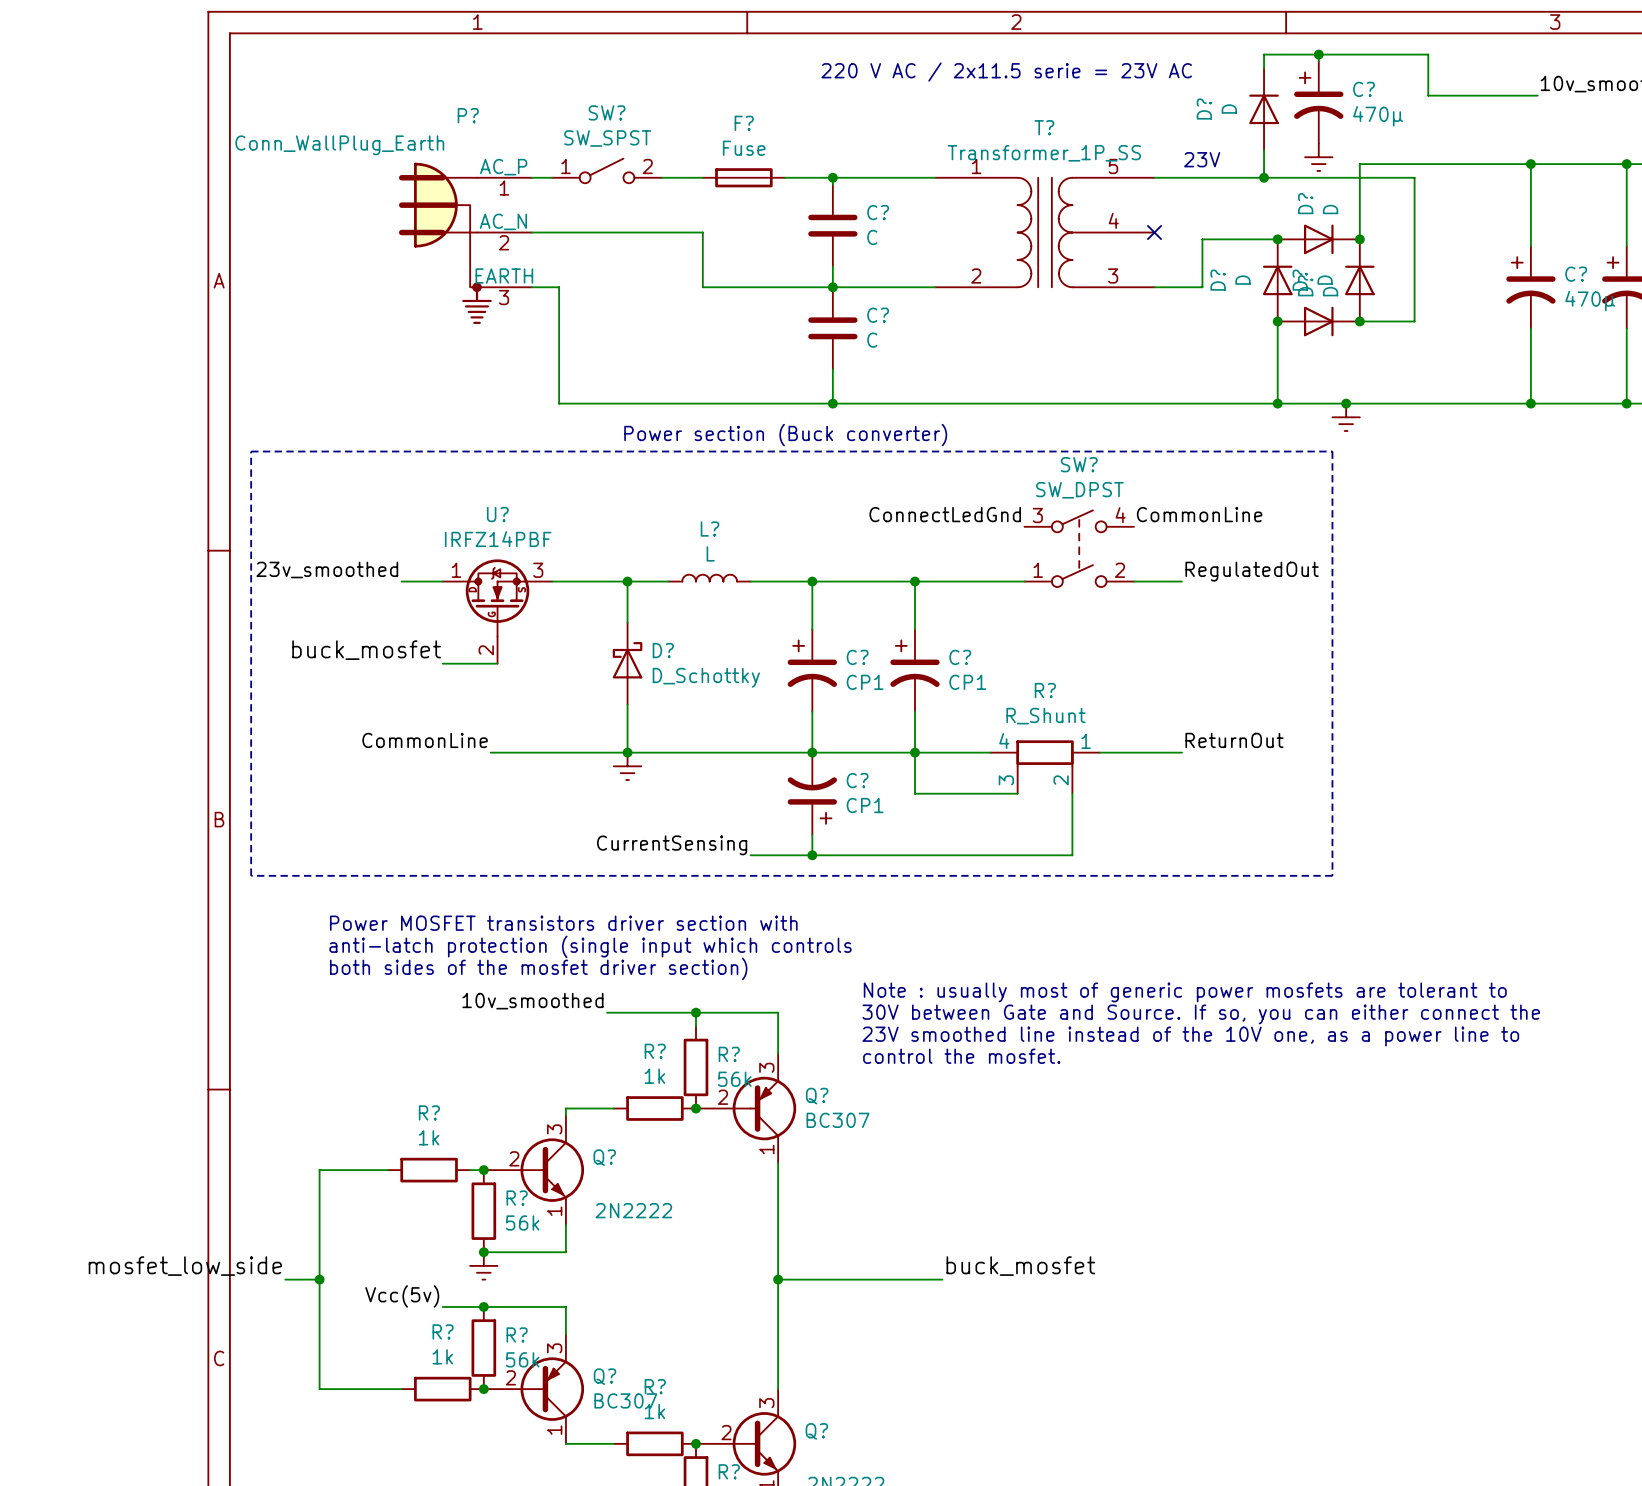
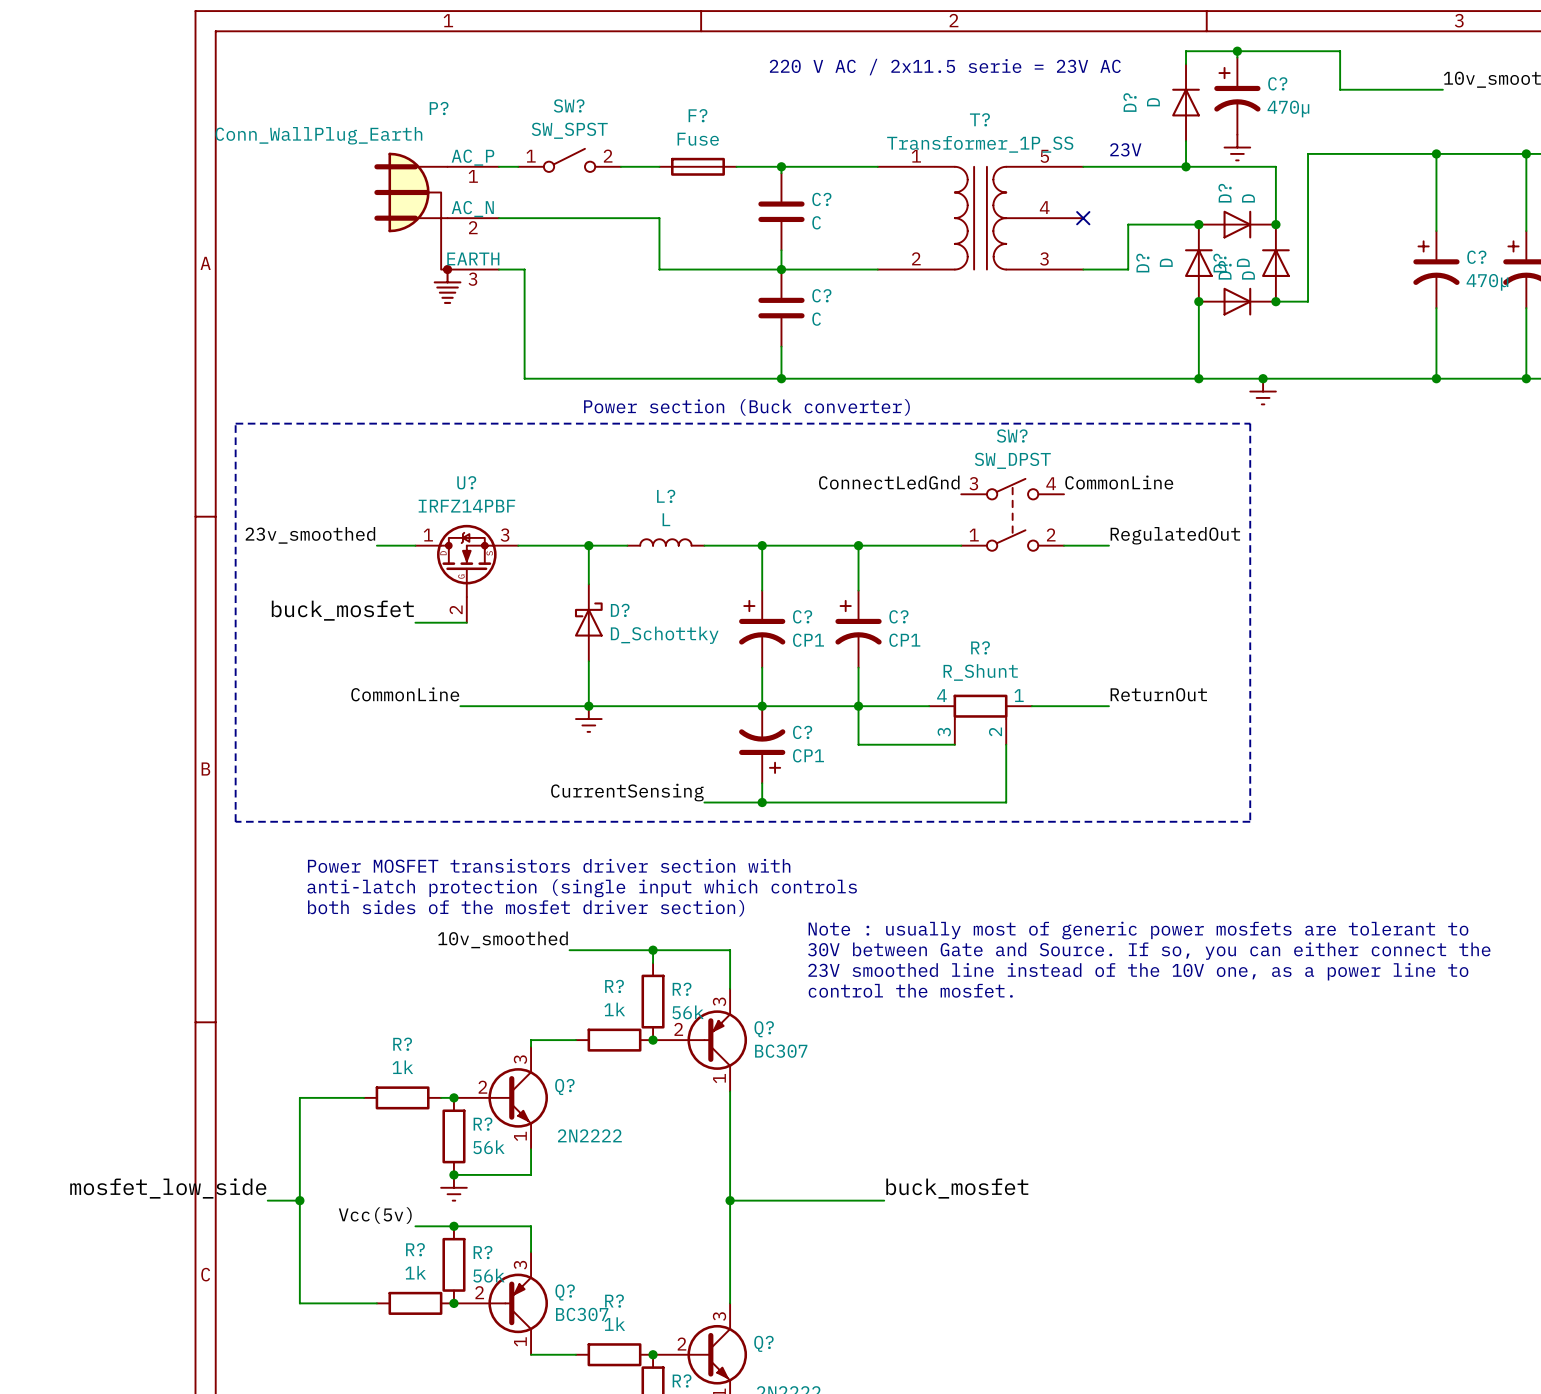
wire: (1394, 164) (1359, 164) (1359, 177) (1414, 177) (1414, 321) (1394, 321) -> (1308, 153) (1308, 301)

